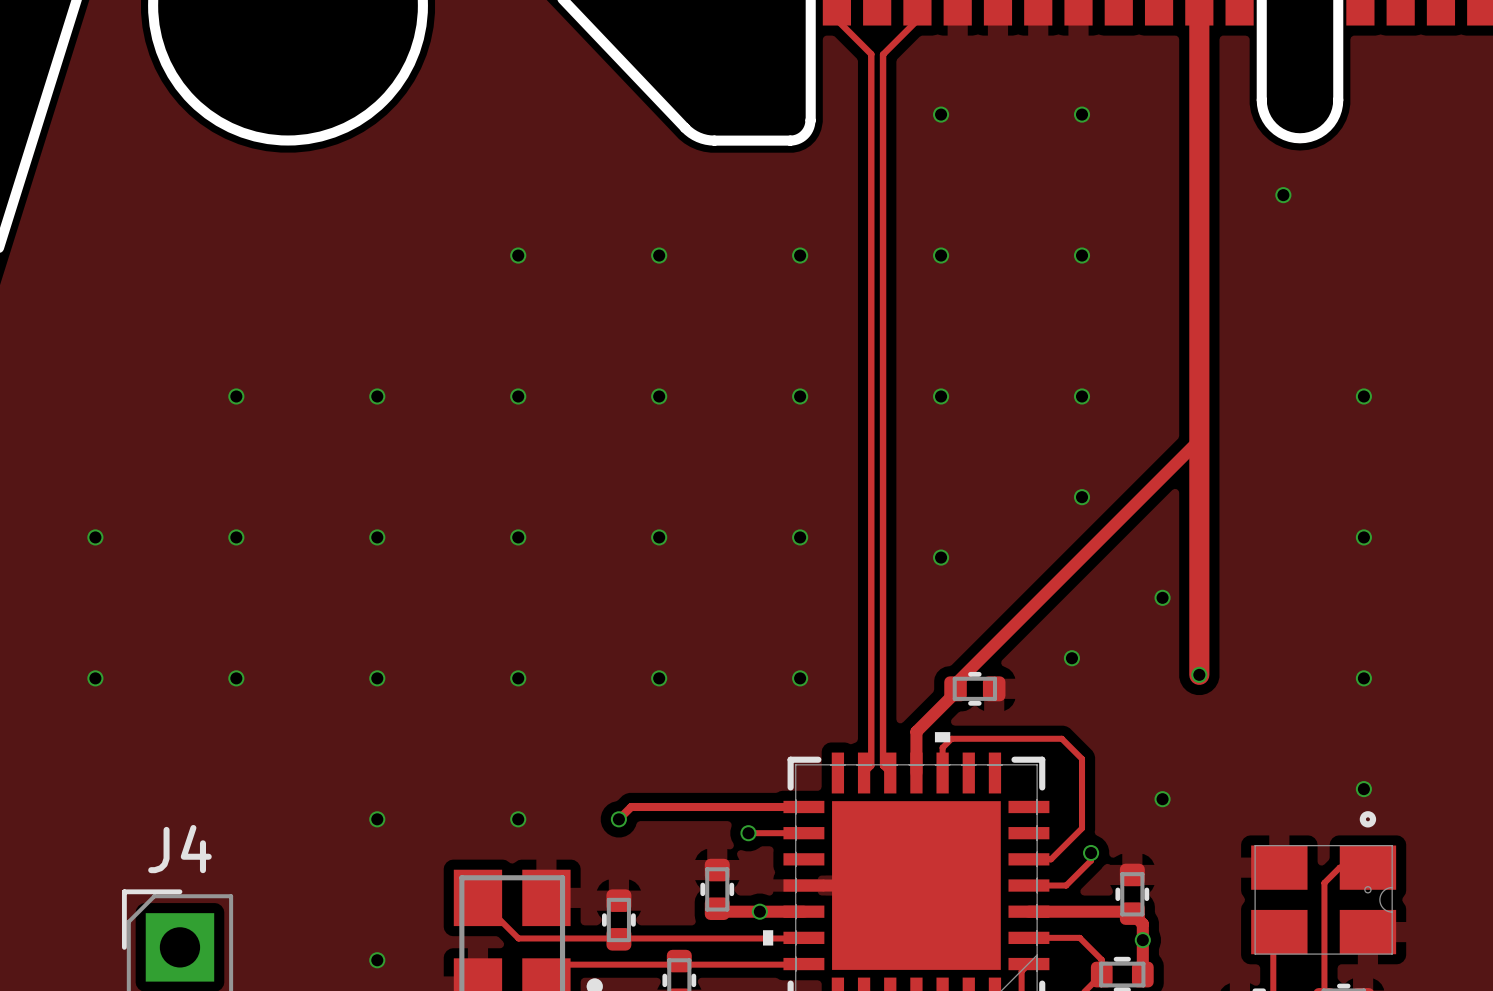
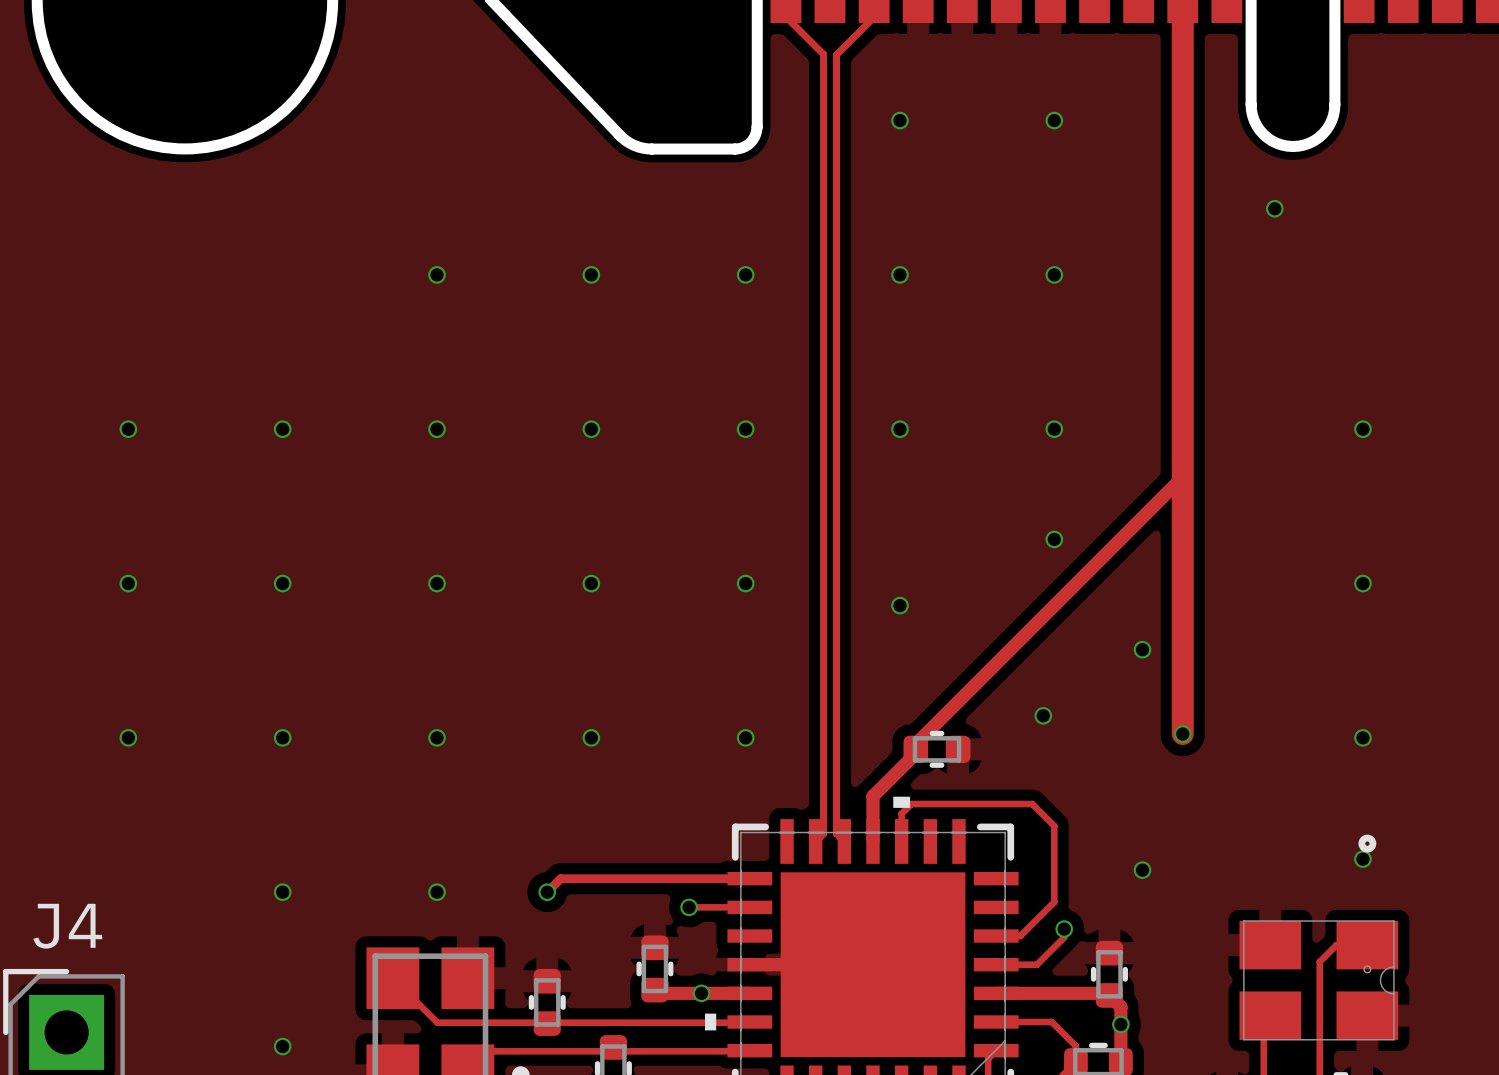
part footprint: [1251, 811, 1397, 955] -> [1239, 834, 1399, 1041]

